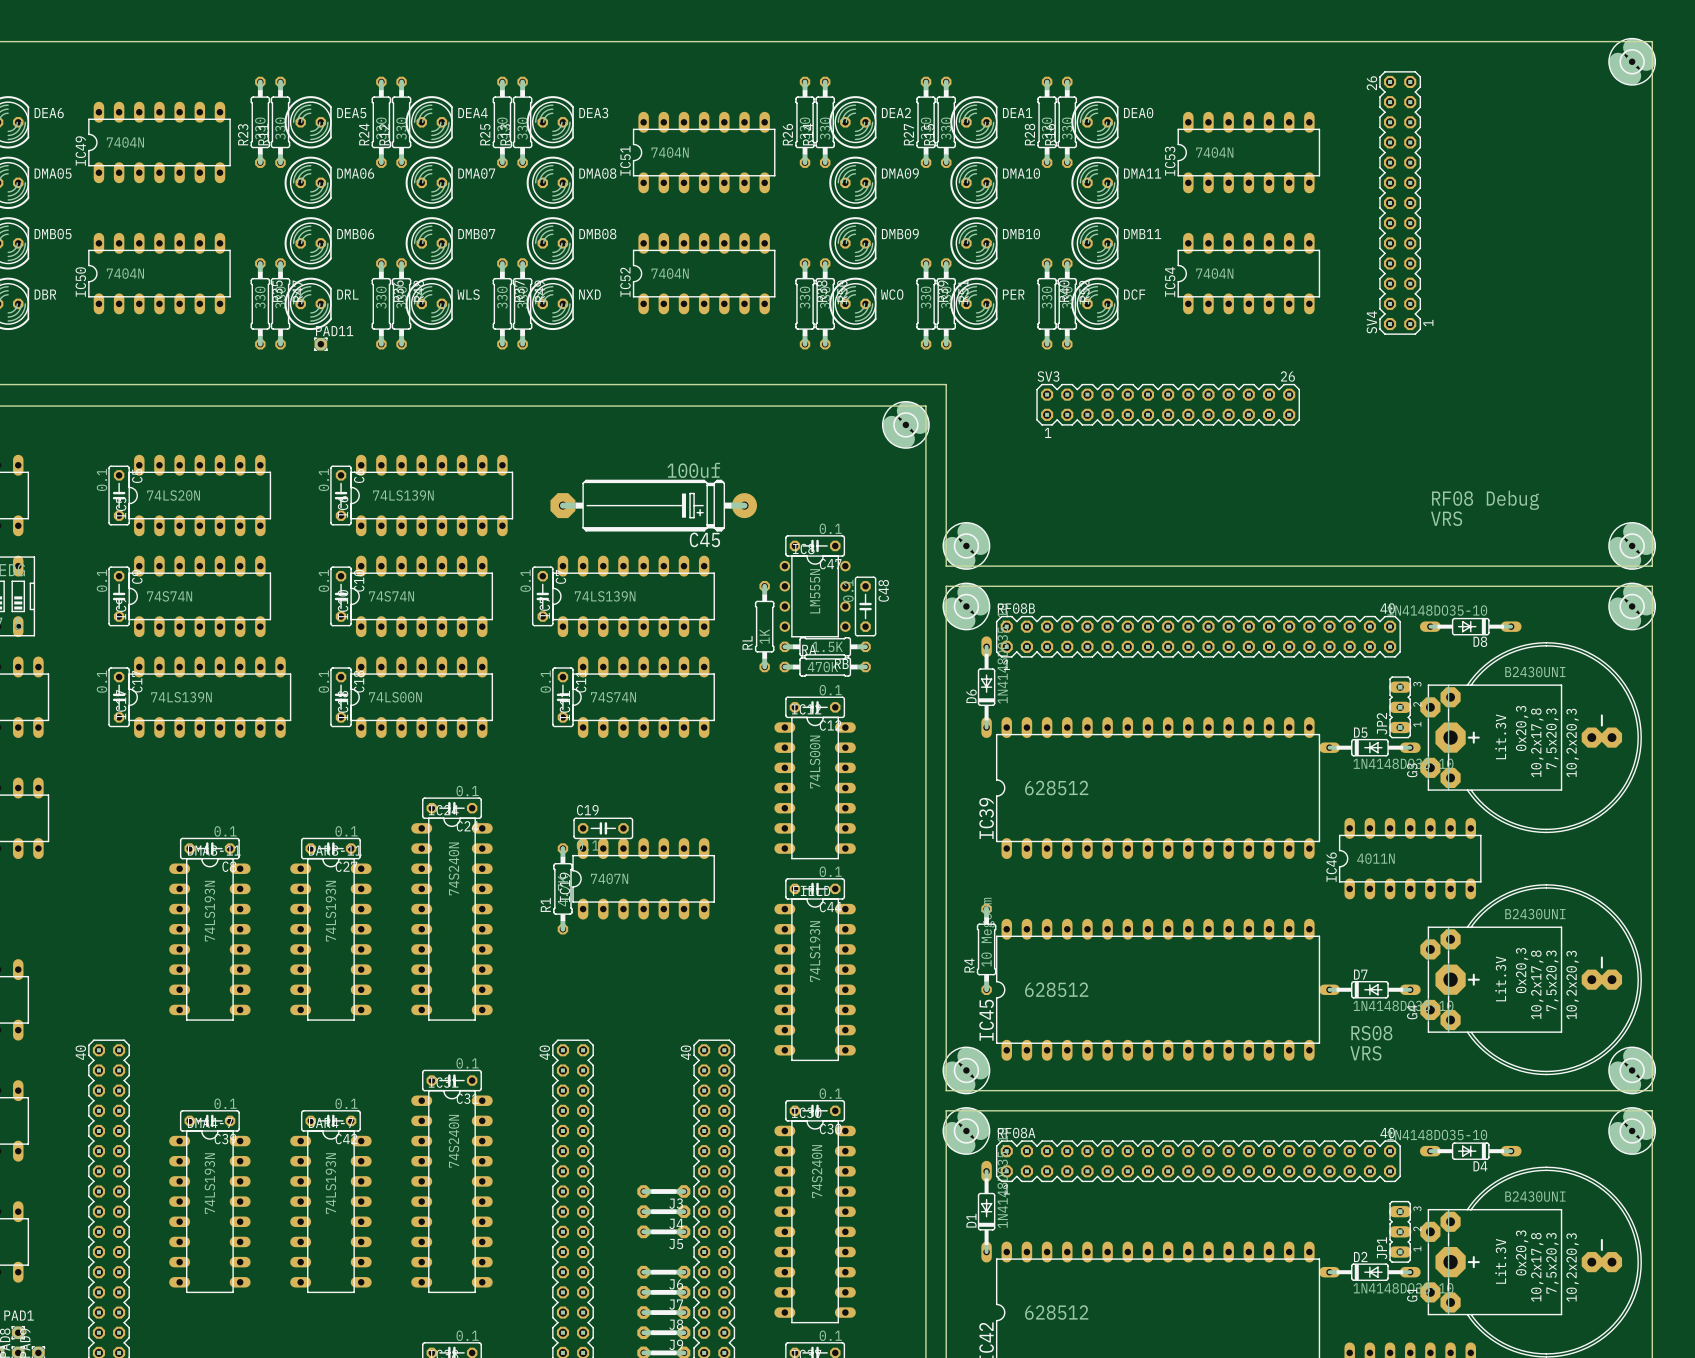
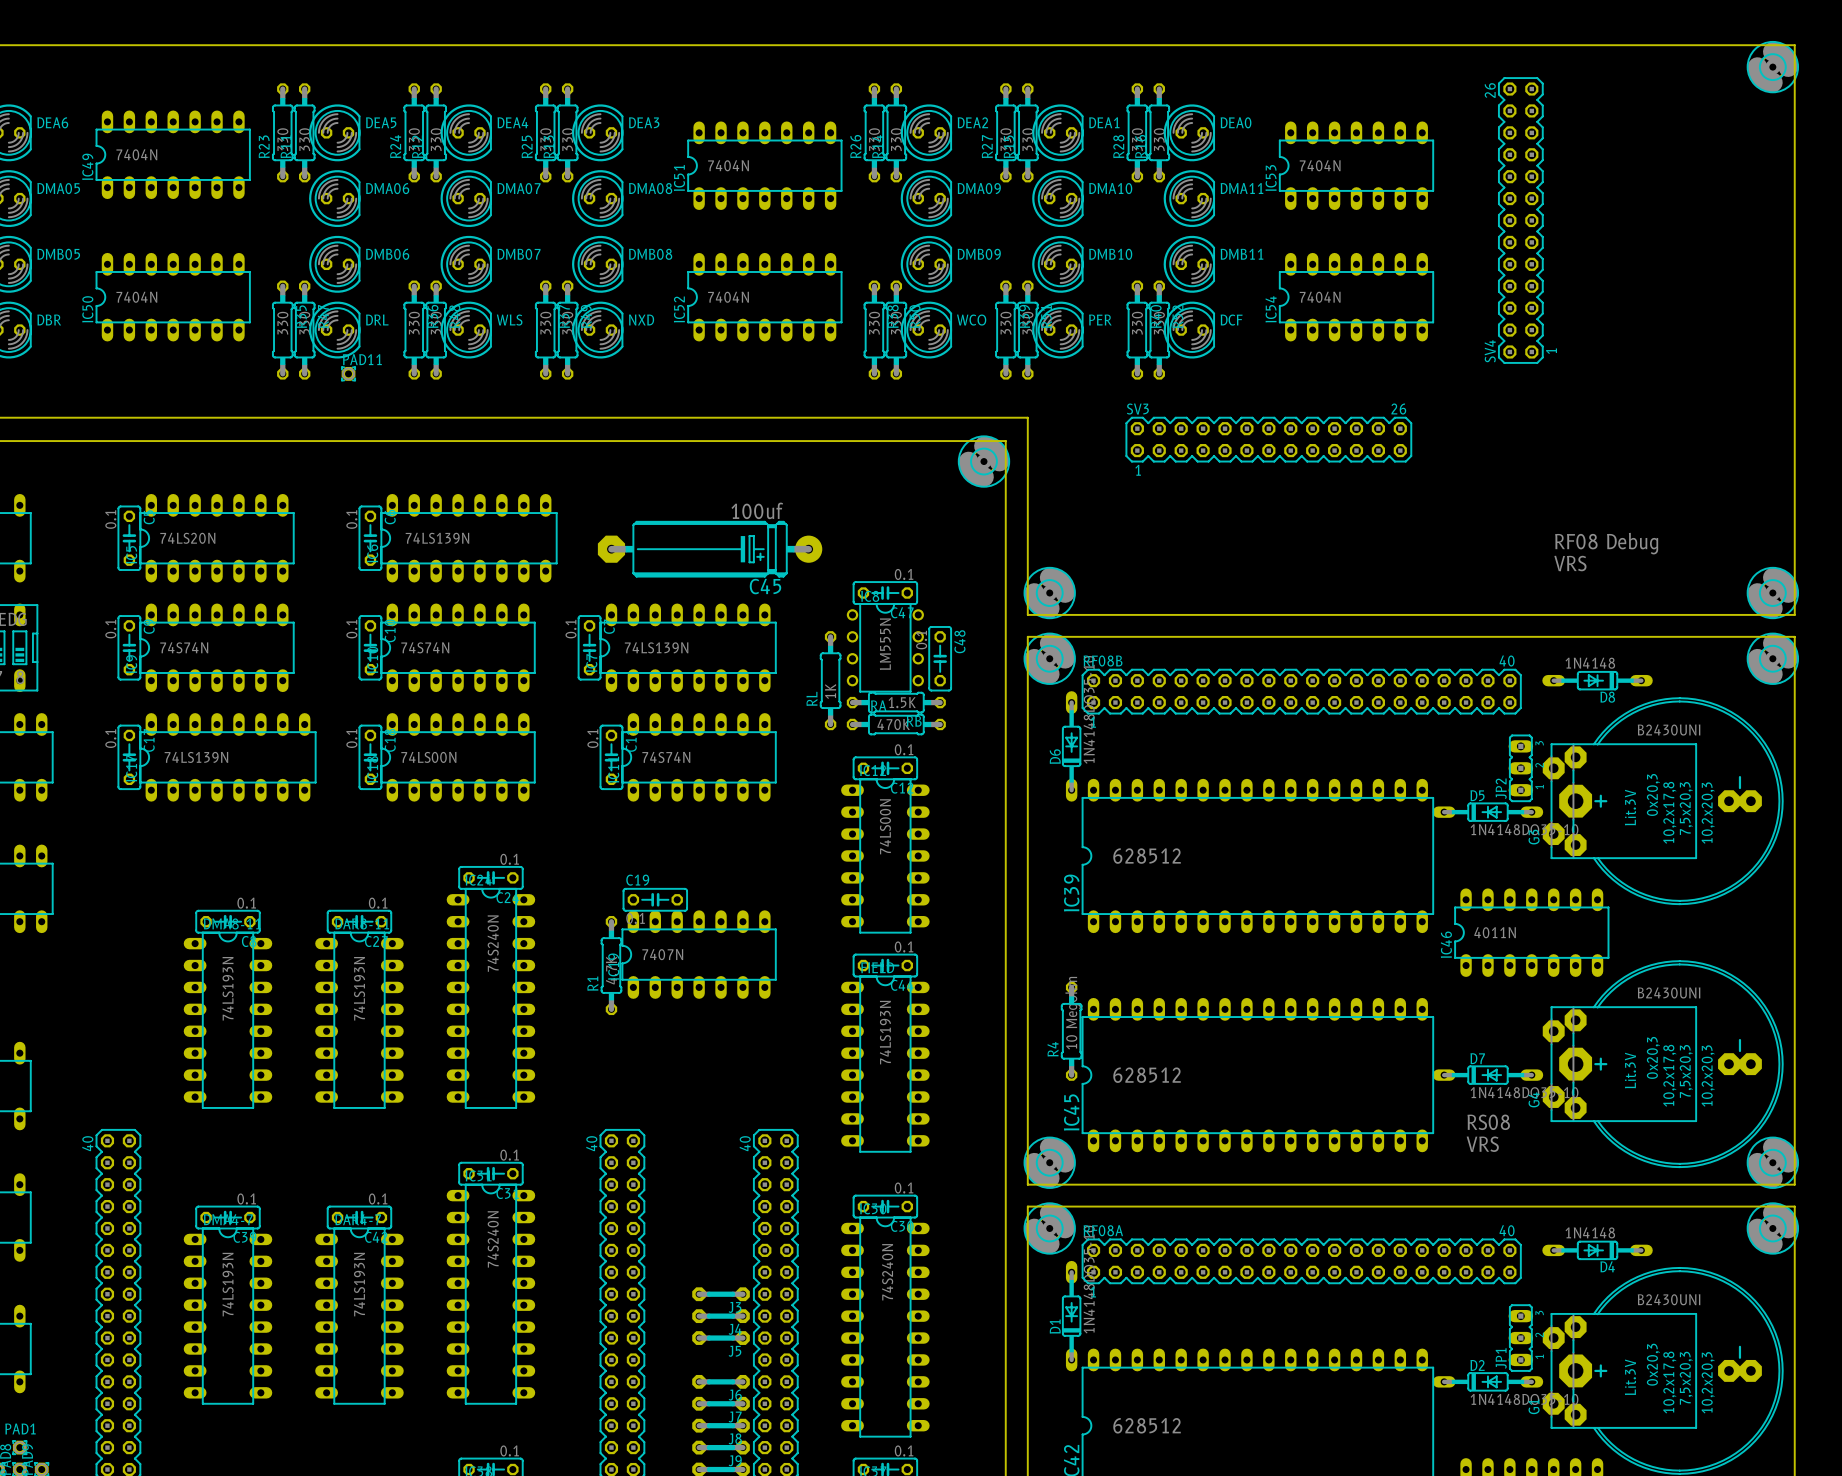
D8 value: 1N4148DO35-10 (1437, 610) -> 1N4148 (1590, 663)
D4 value: 1N4148DO35-10 (1437, 1135) -> 1N4148 (1590, 1232)

